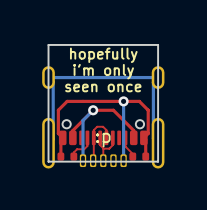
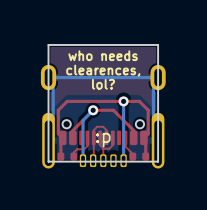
text: hopefully (103, 55) -> who needs (103, 55)
part footprint: [42, 66, 165, 169] -> [40, 64, 166, 169]
text: i'm only (103, 71) -> clearences, (103, 70)
text: seen once (103, 87) -> lol? (103, 84)

